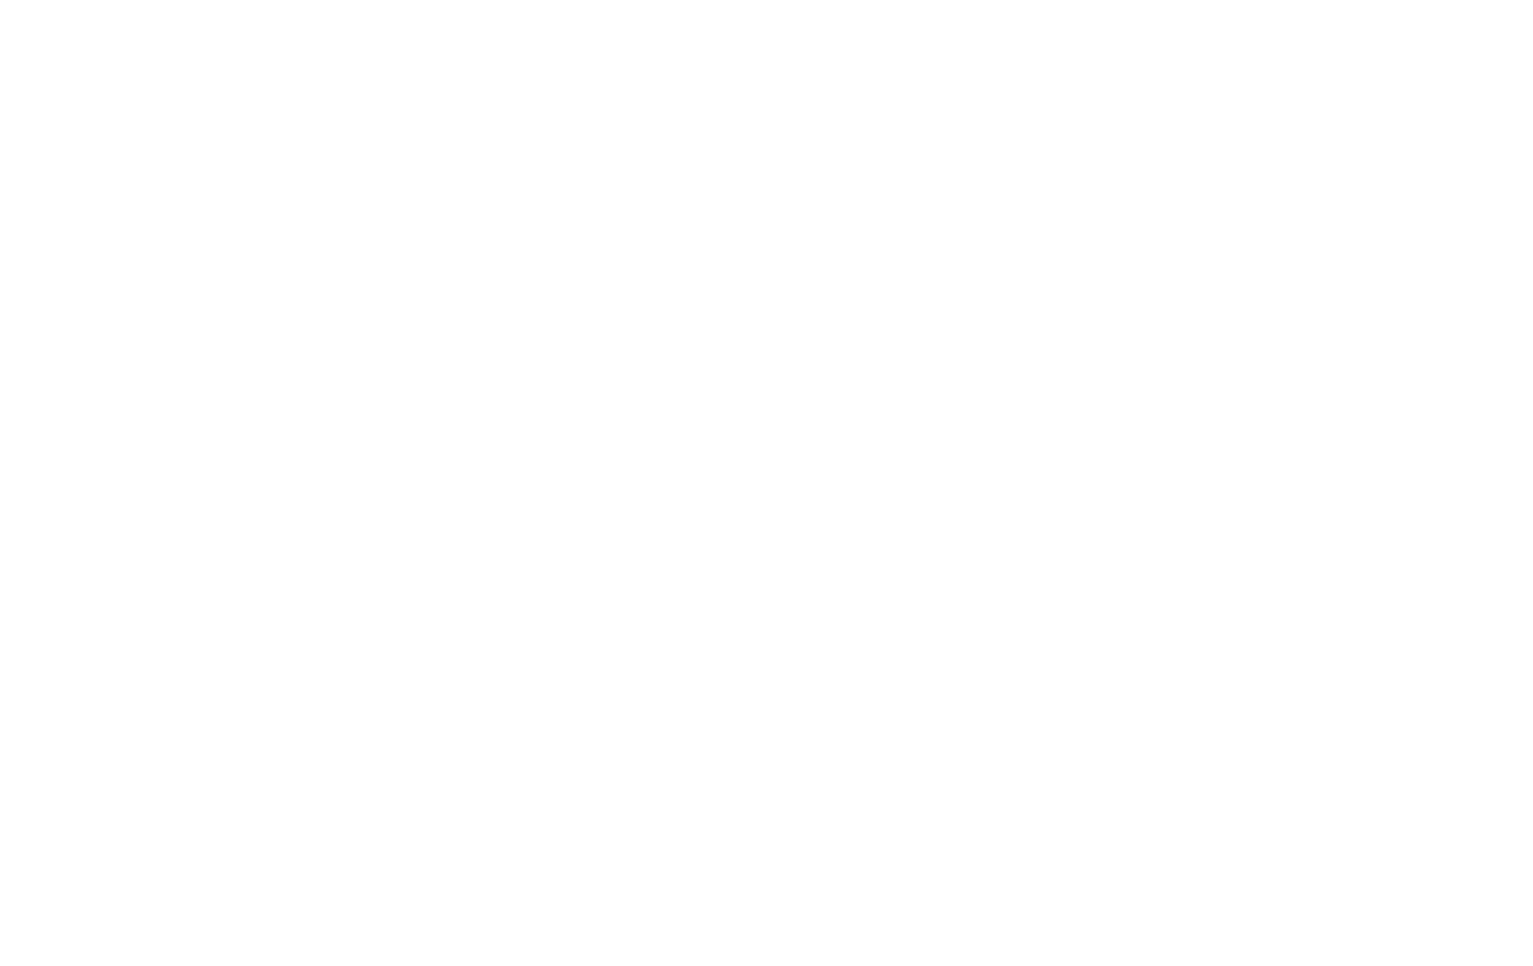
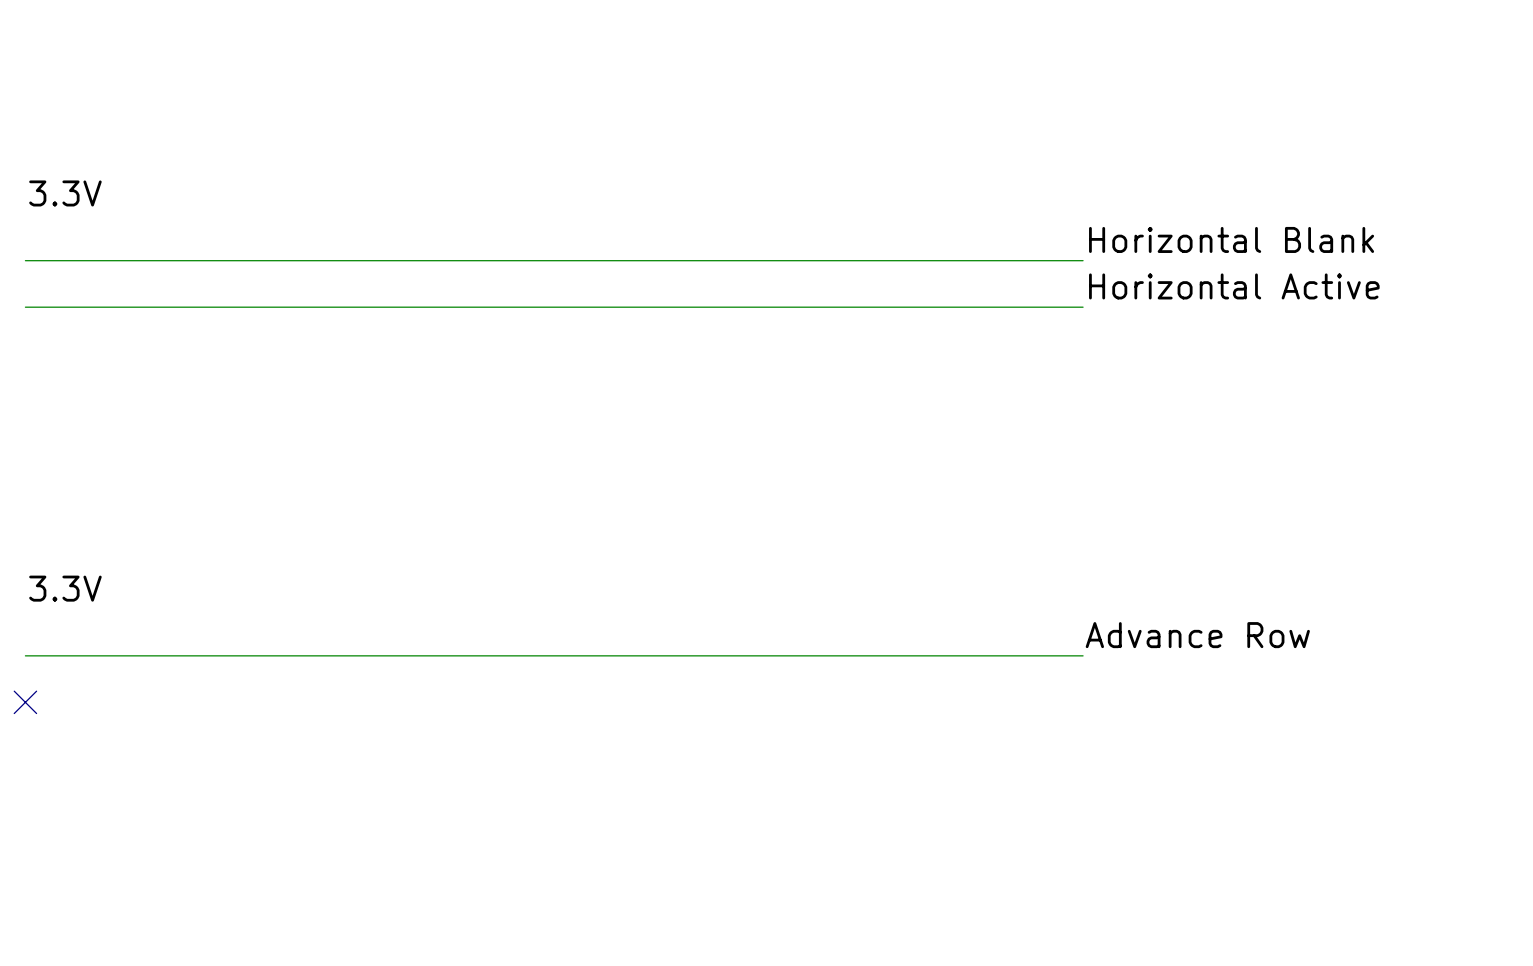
label: none -> 3.3V (65, 193)
label: none -> Horizontal Blank (1231, 239)
wire: none -> (25, 260) (1083, 260)
label: none -> Horizontal Active (1234, 286)
wire: none -> (25, 307) (1083, 307)
label: none -> 3.3V (65, 588)
label: none -> Advance Row (1197, 635)
wire: none -> (25, 655) (1083, 655)
no-connect mark: none -> (25, 702)

